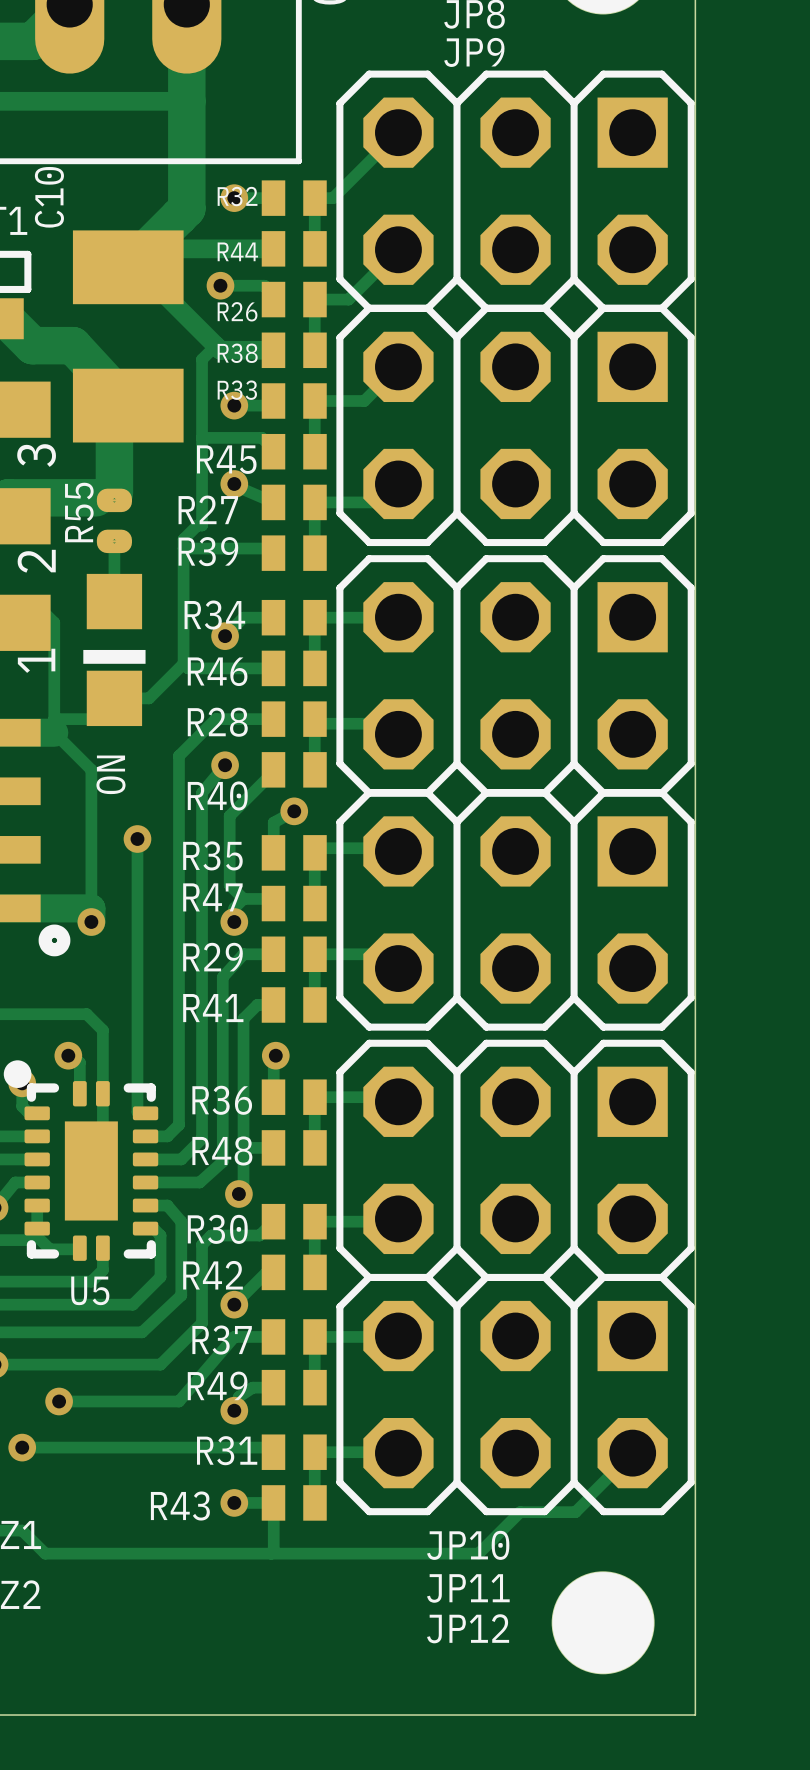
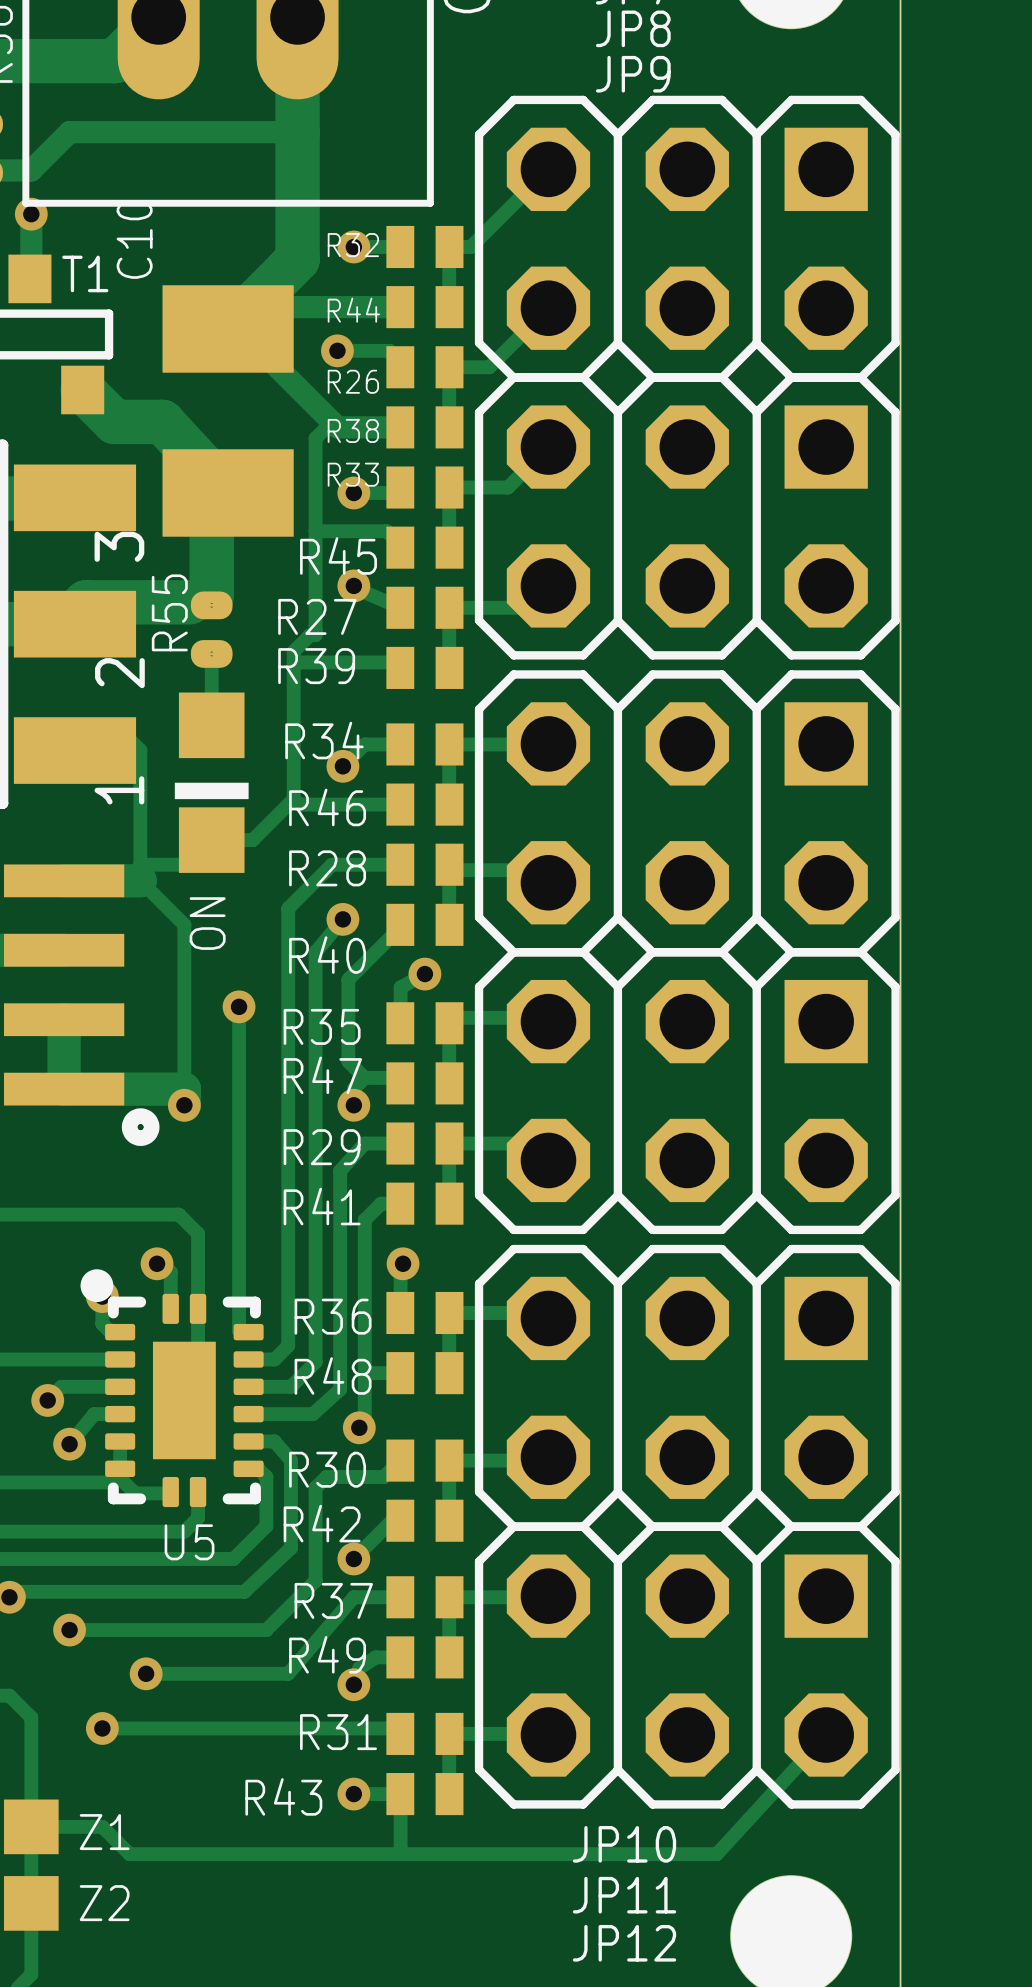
track: (632, 1453) (575, 1512) (520, 1512) (478, 1553) -> (826, 1735) (716, 1854) (643, 1854)

